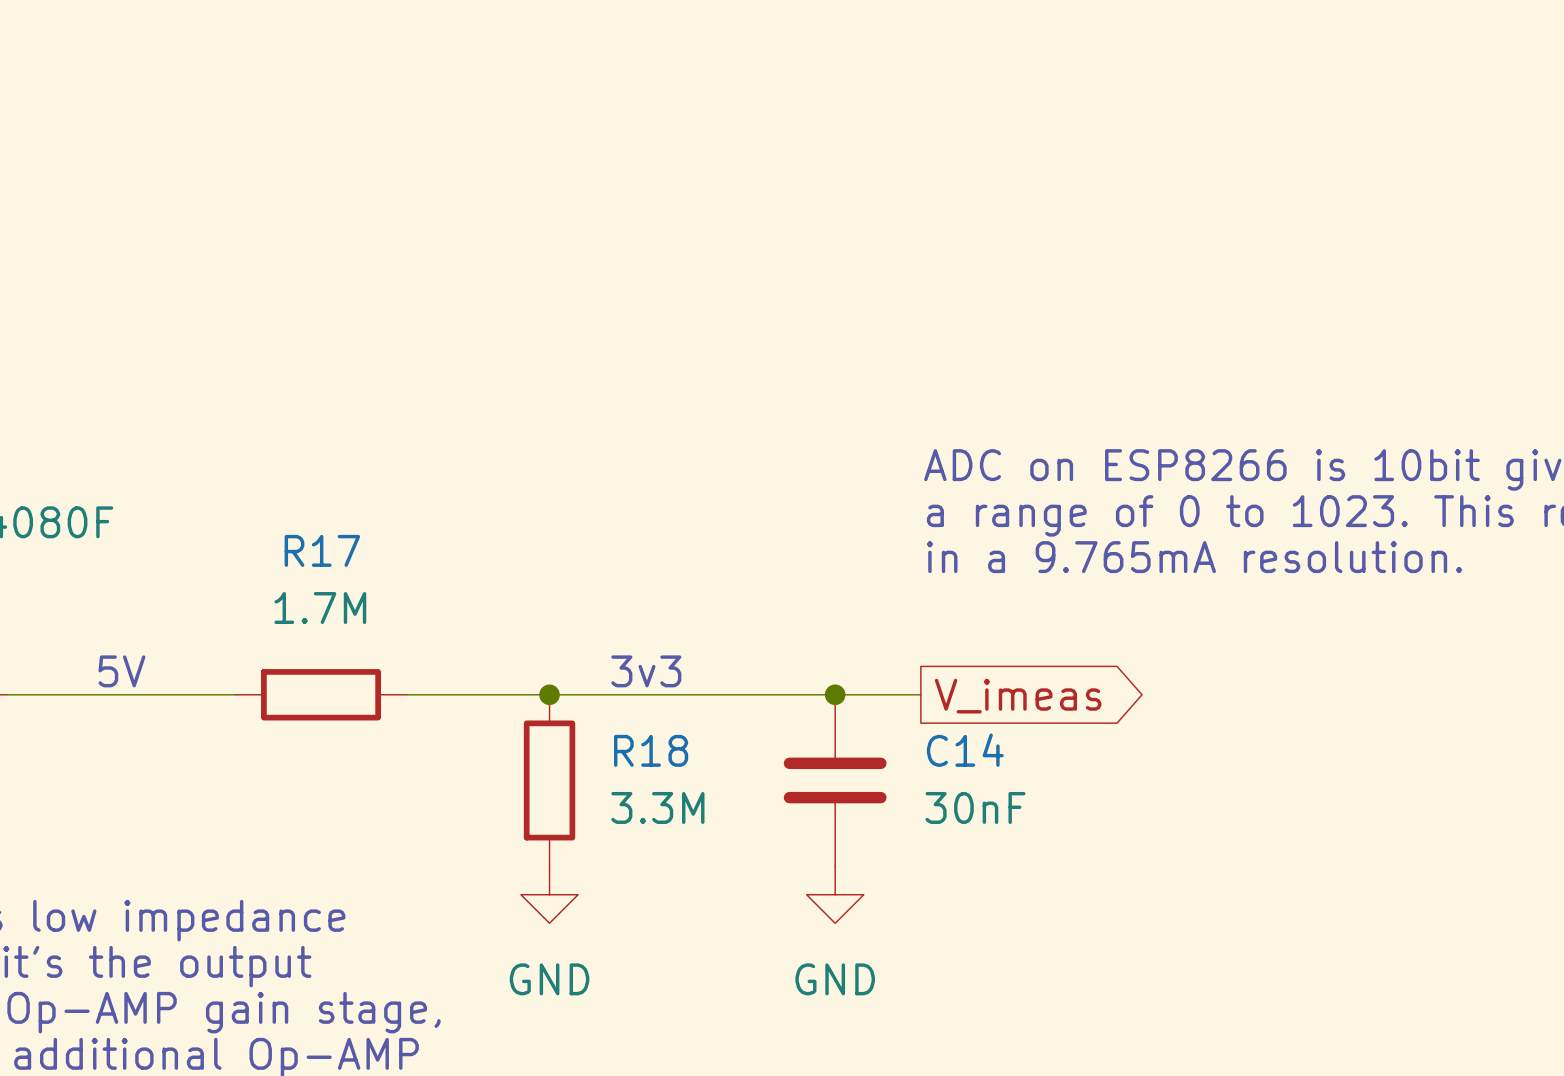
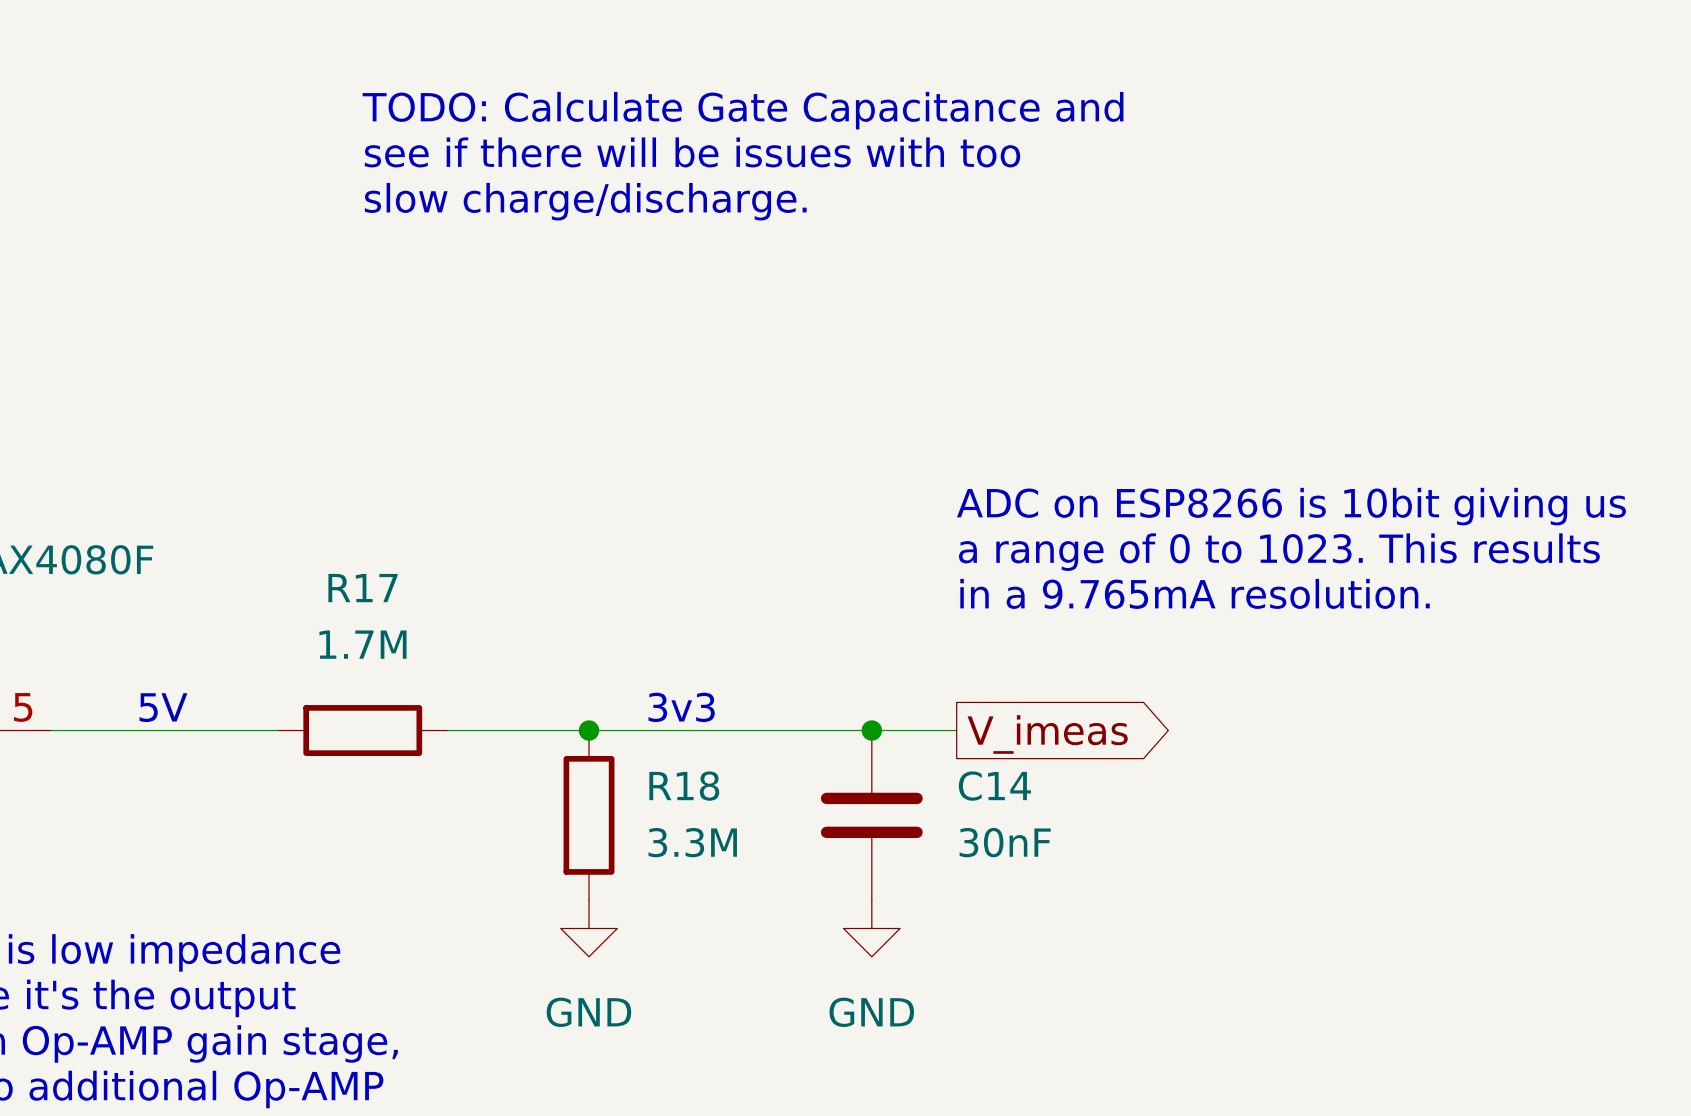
text: none -> TODO: Calculate Gate Capacitance and (743, 110)
text: none -> see if there will be issues with too (692, 152)
text: none -> slow charge/discharge. (585, 201)

